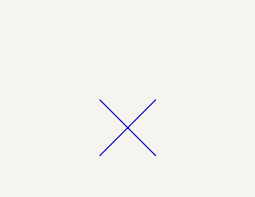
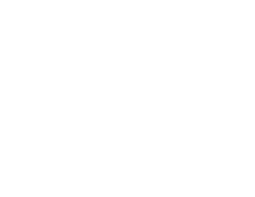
no-connect mark: (127, 127) -> none

